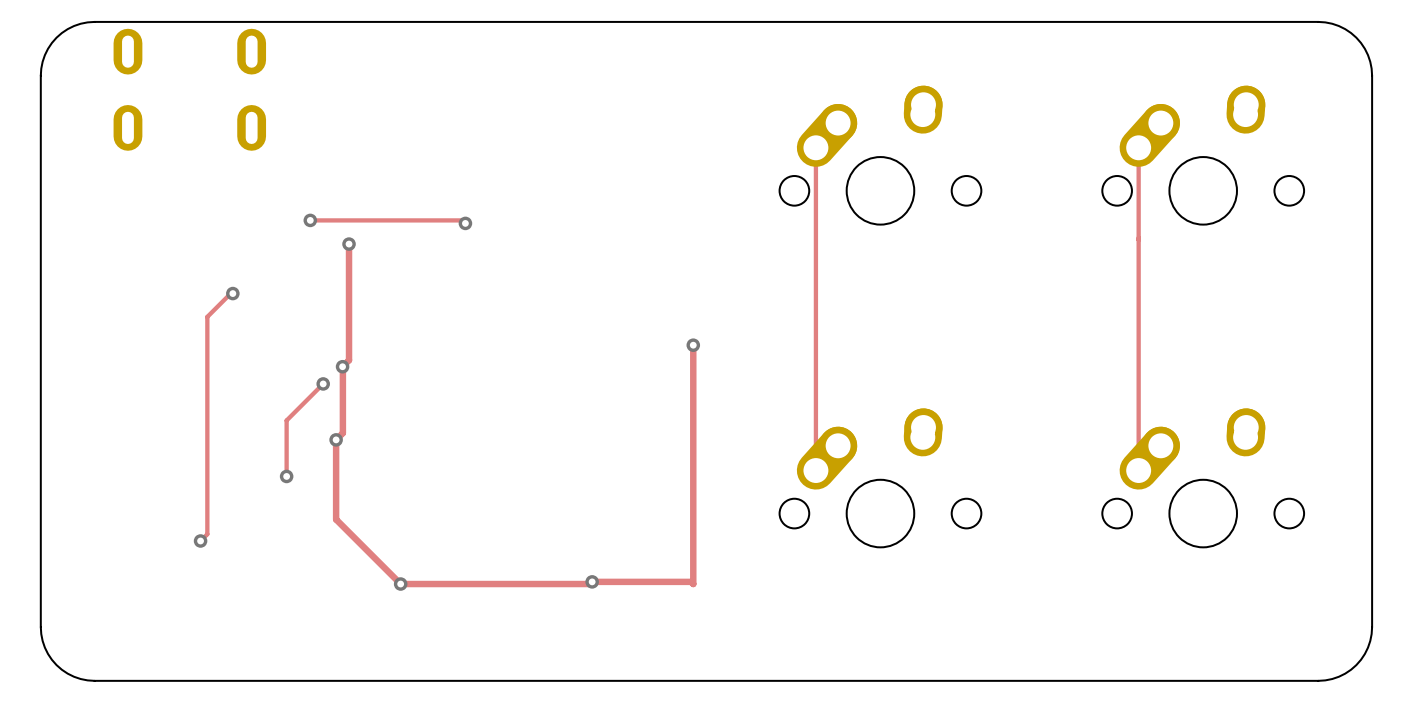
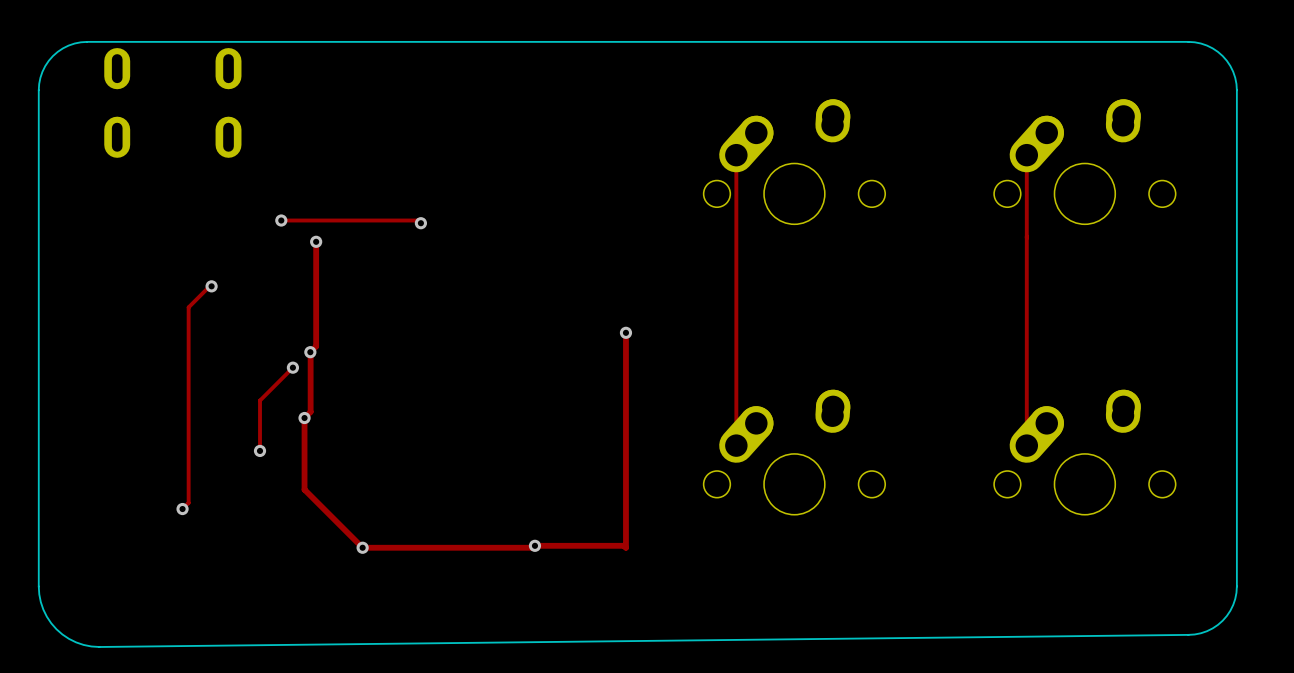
board edge: (94, 21) (1318, 21) (1332, 23) (1345, 29) (1356, 37) (1364, 48) (1370, 61) (1372, 75) (1372, 627) (1370, 640) (1364, 653) (1356, 665) (1345, 673) (1332, 679) (1318, 680) (94, 680) (80, 679) (67, 673) (56, 665) (48, 653) (42, 640) (40, 627) (40, 75) (44, 55) (56, 37) (74, 26) (94, 21) -> none
line: none -> (87, 41) (1188, 41) (1201, 43) (1212, 48) (1222, 56) (1230, 66) (1235, 77) (1236, 90) (1236, 586) (1235, 599) (1230, 610) (1222, 620) (1212, 628) (1201, 633) (1188, 634) (99, 646) (83, 644) (69, 638) (56, 629) (46, 616) (40, 602) (38, 586) (38, 90) (42, 71) (52, 56) (68, 45) (87, 41)

